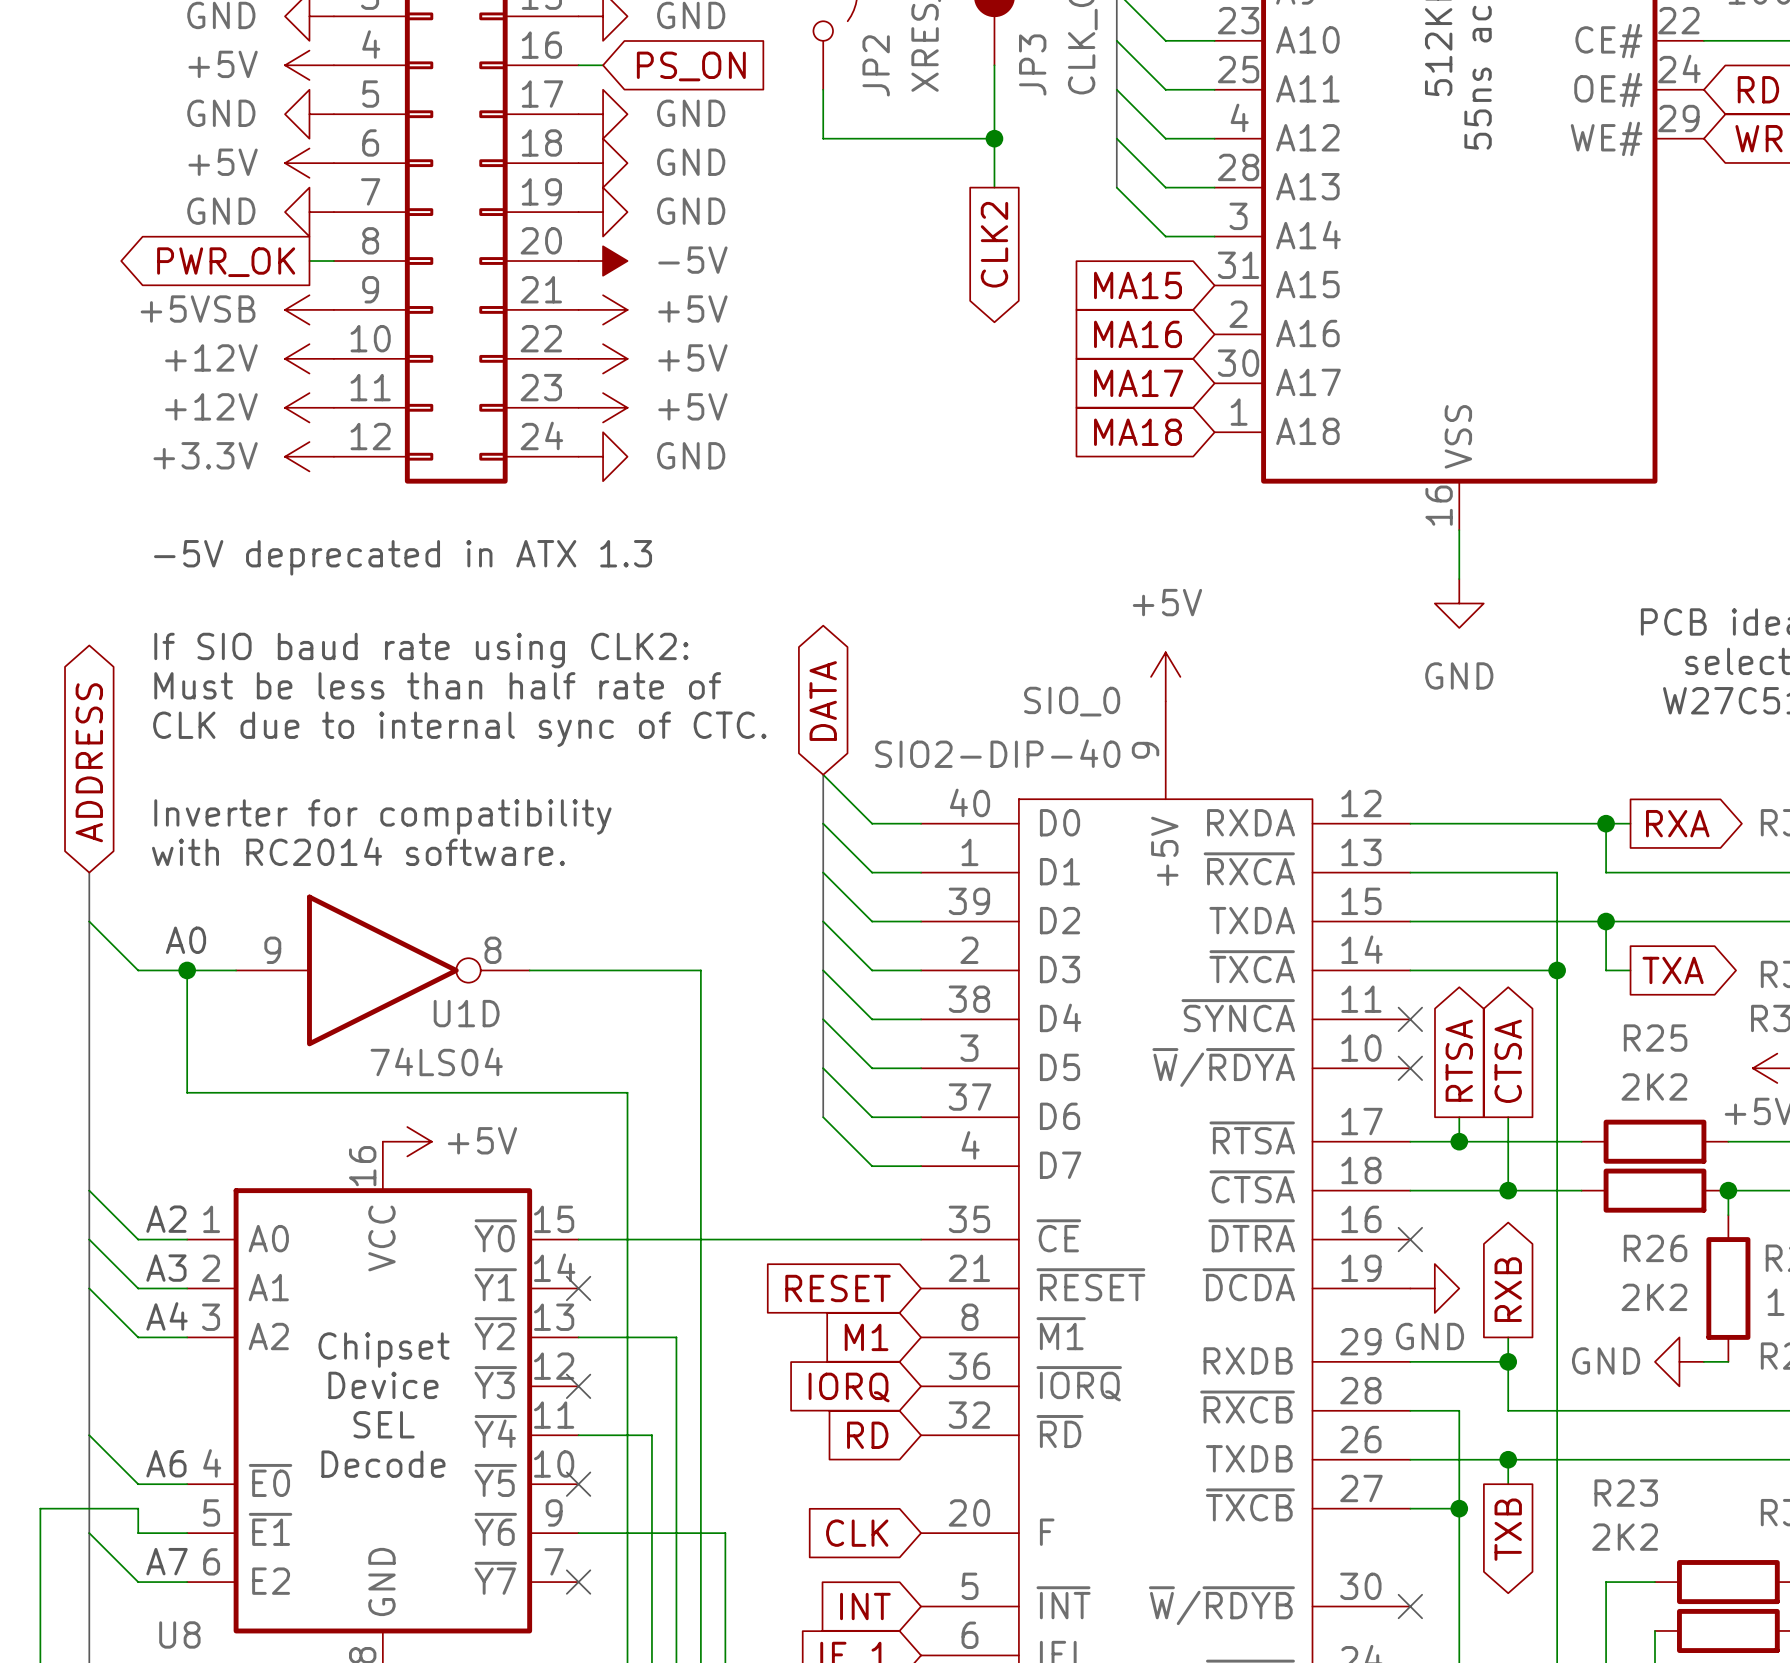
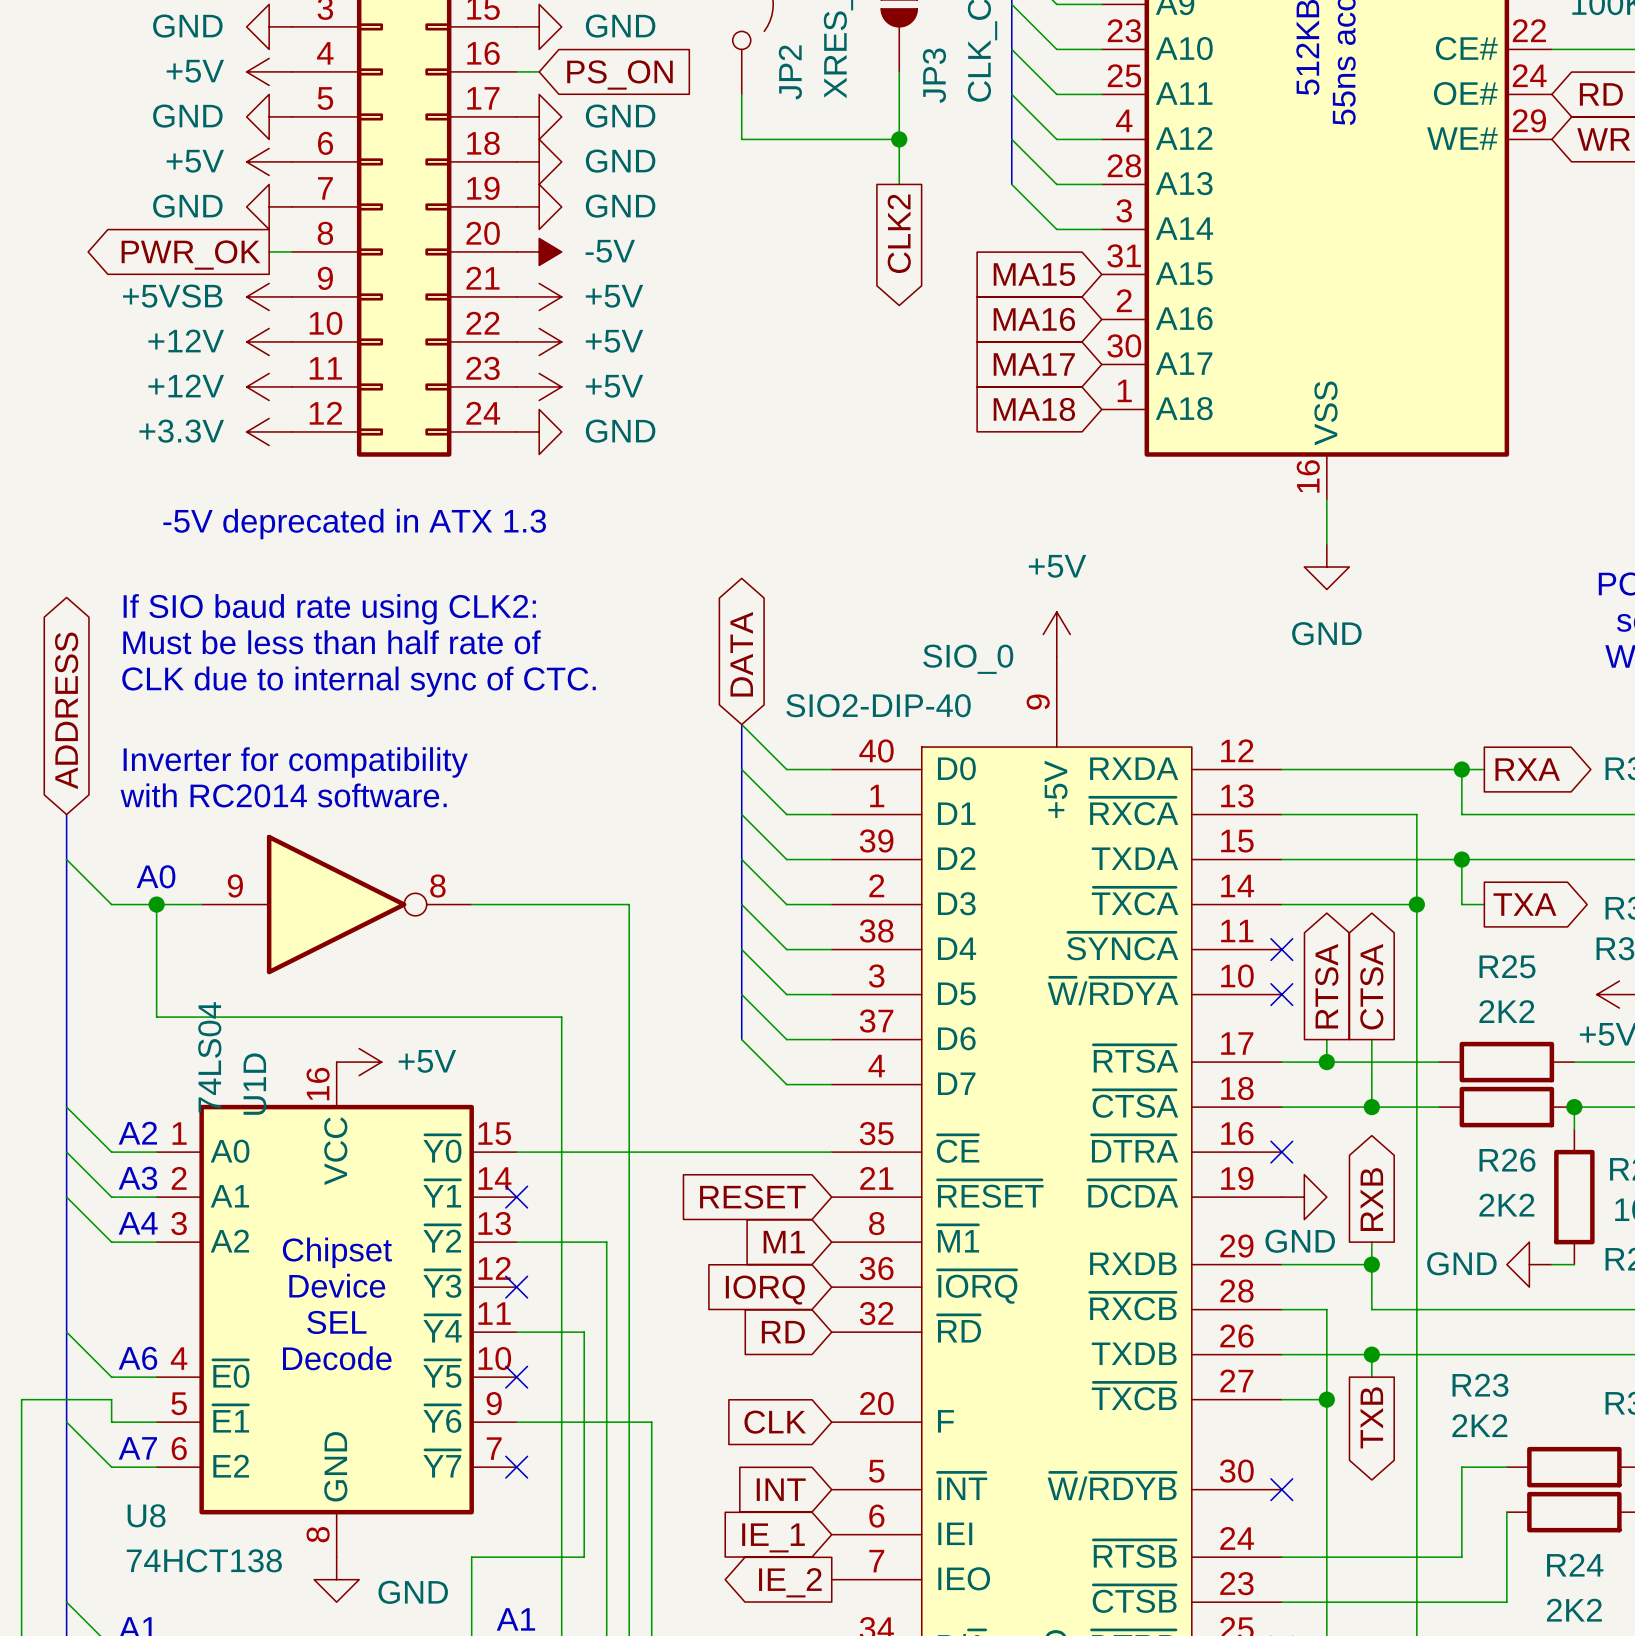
U1D name rotation: 0° (466, 1013) -> 90° counterclockwise (254, 1084)
U1D name position: U1D (466, 1013) -> U1D (254, 1084)
U1D value rotation: 0° (436, 1061) -> 90° counterclockwise (209, 1057)
U1D value position: 74LS04 (436, 1061) -> 74LS04 (209, 1057)

